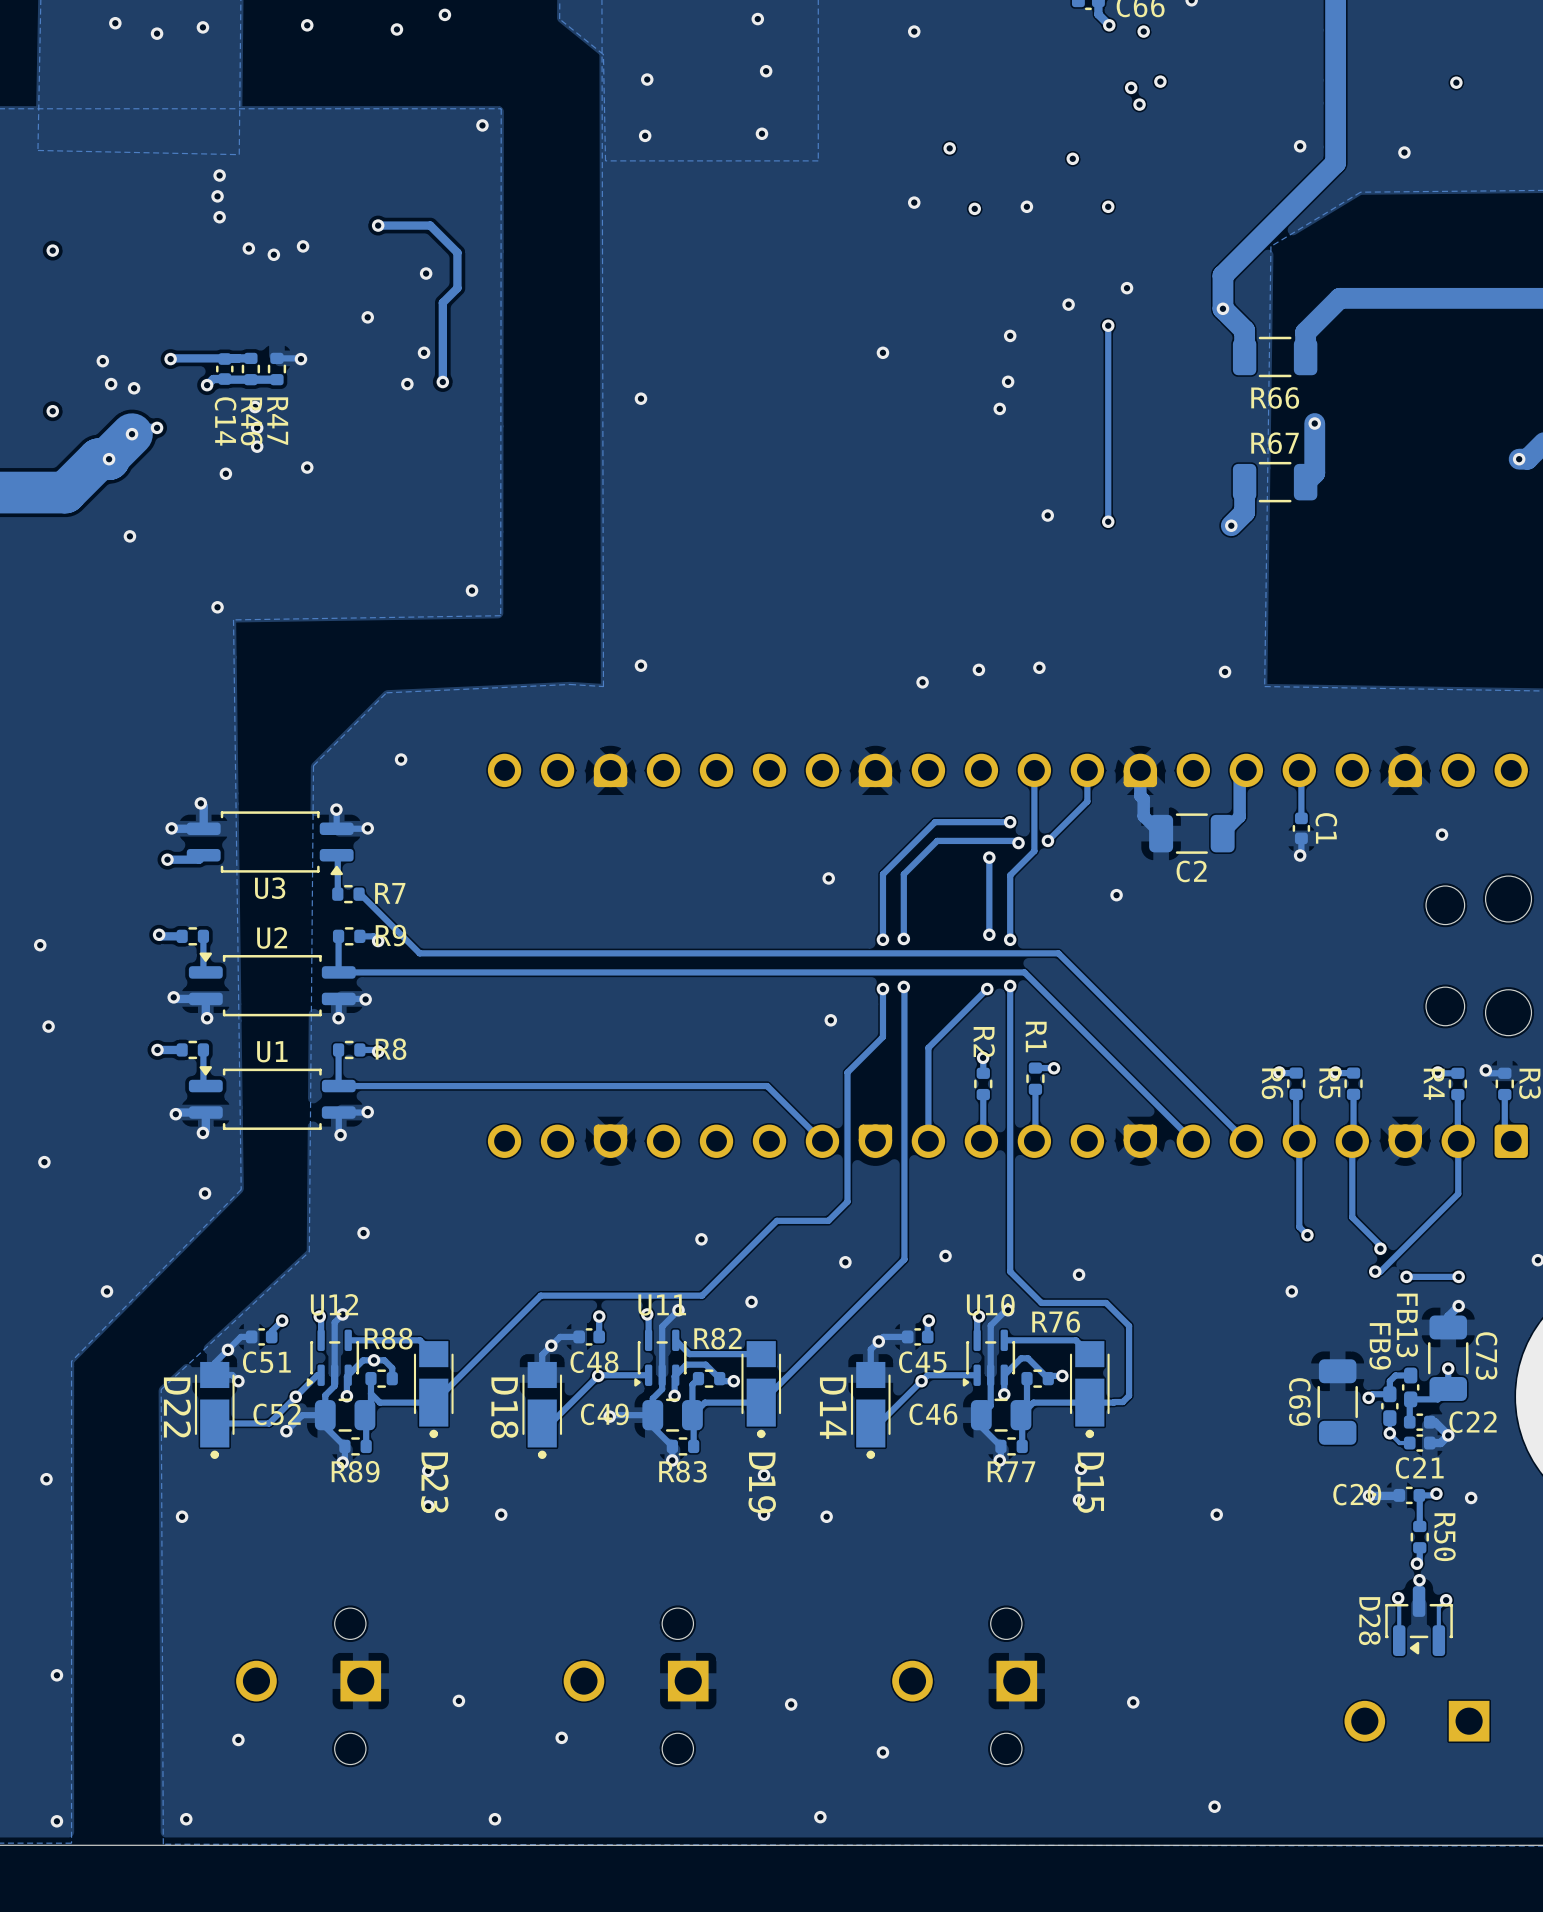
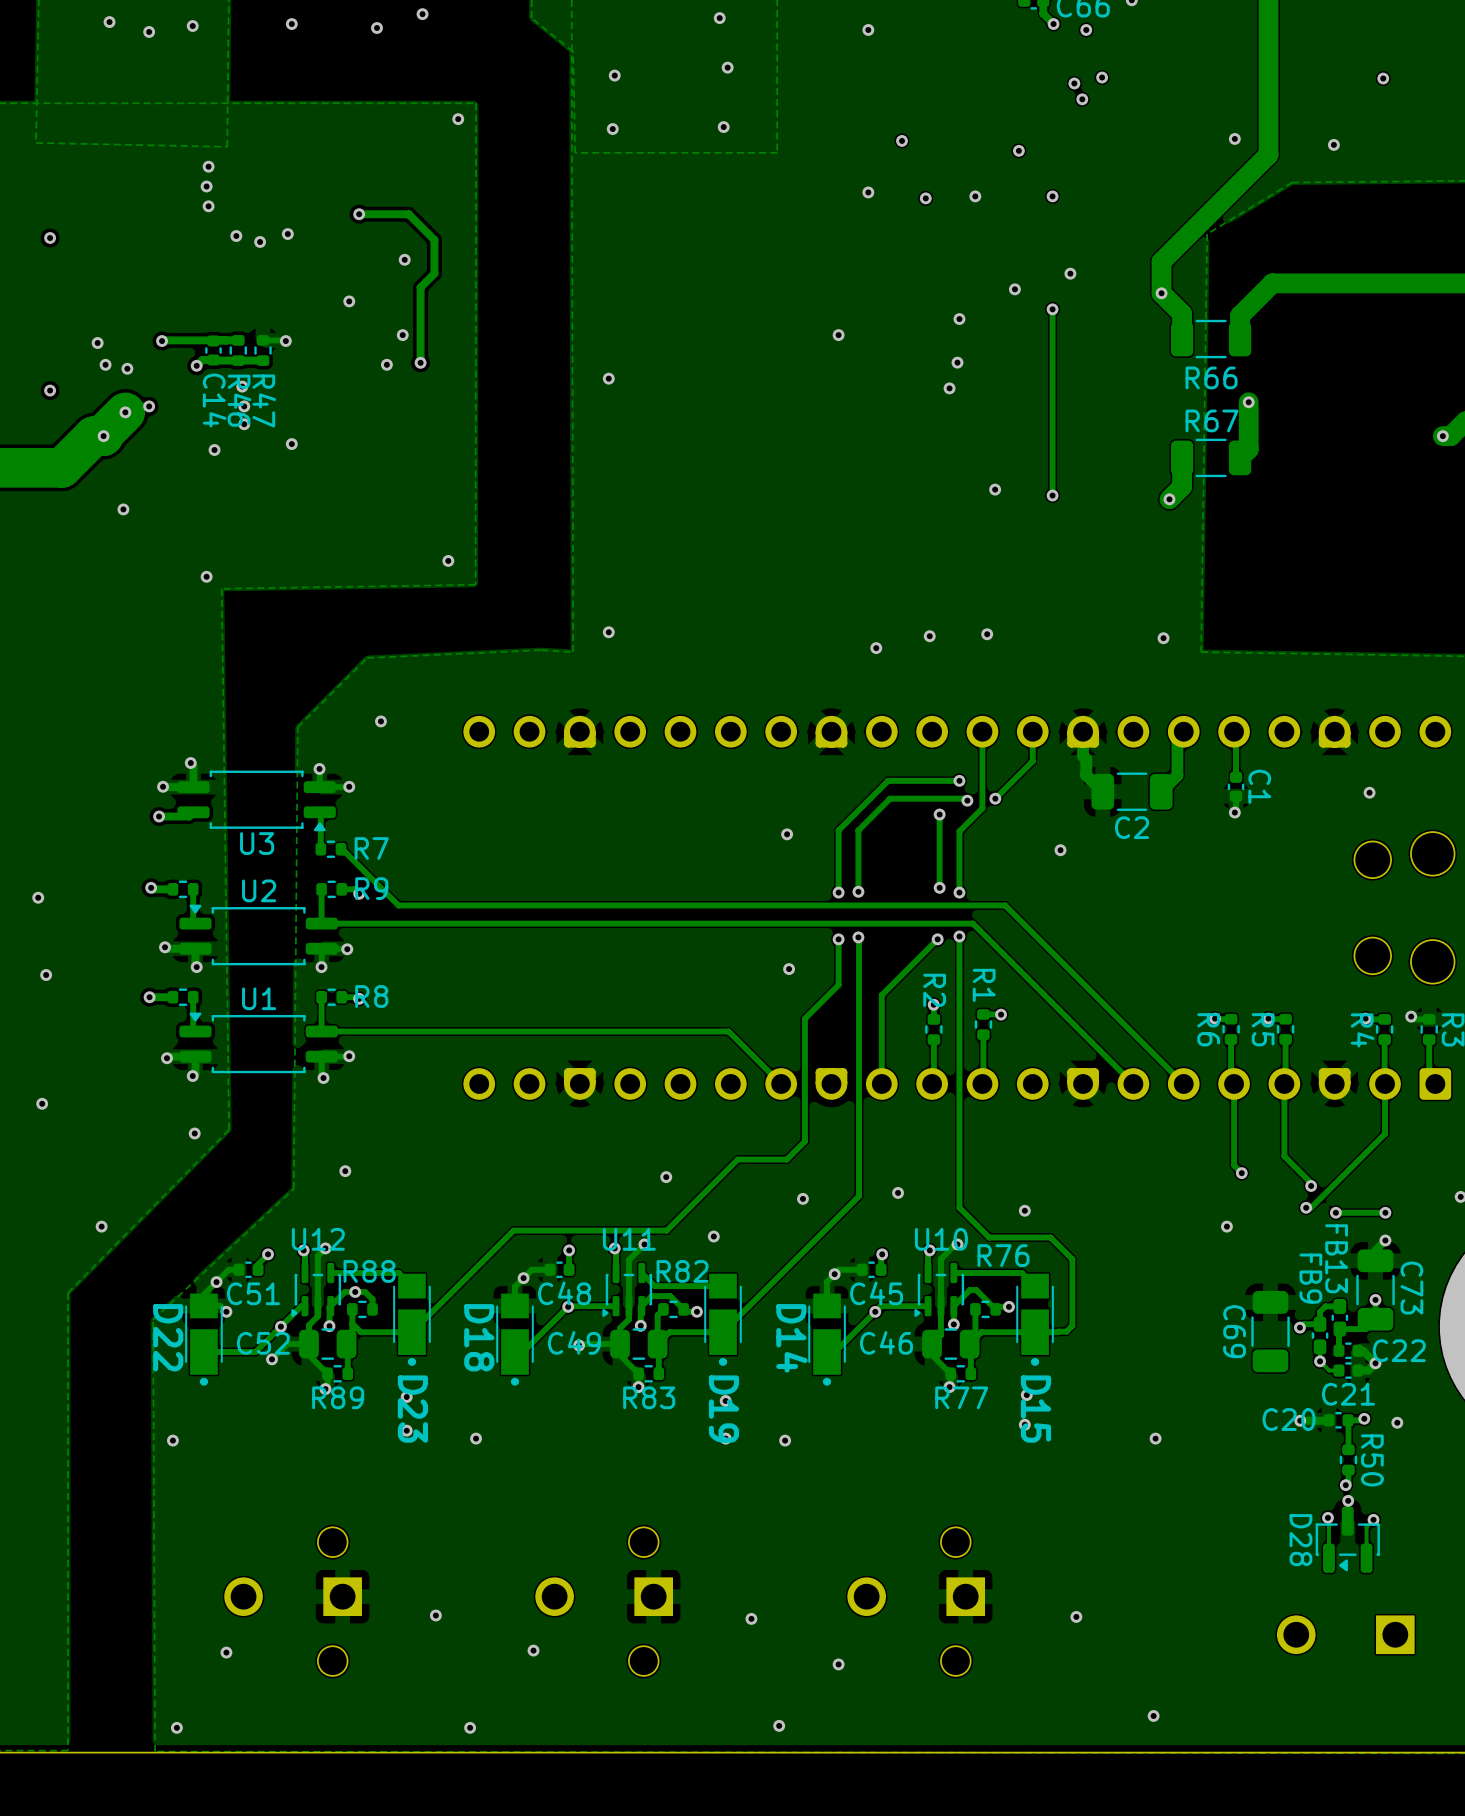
via: (46, 1479) -> none
via: (56, 1675) -> none
via: (56, 1821) -> none

